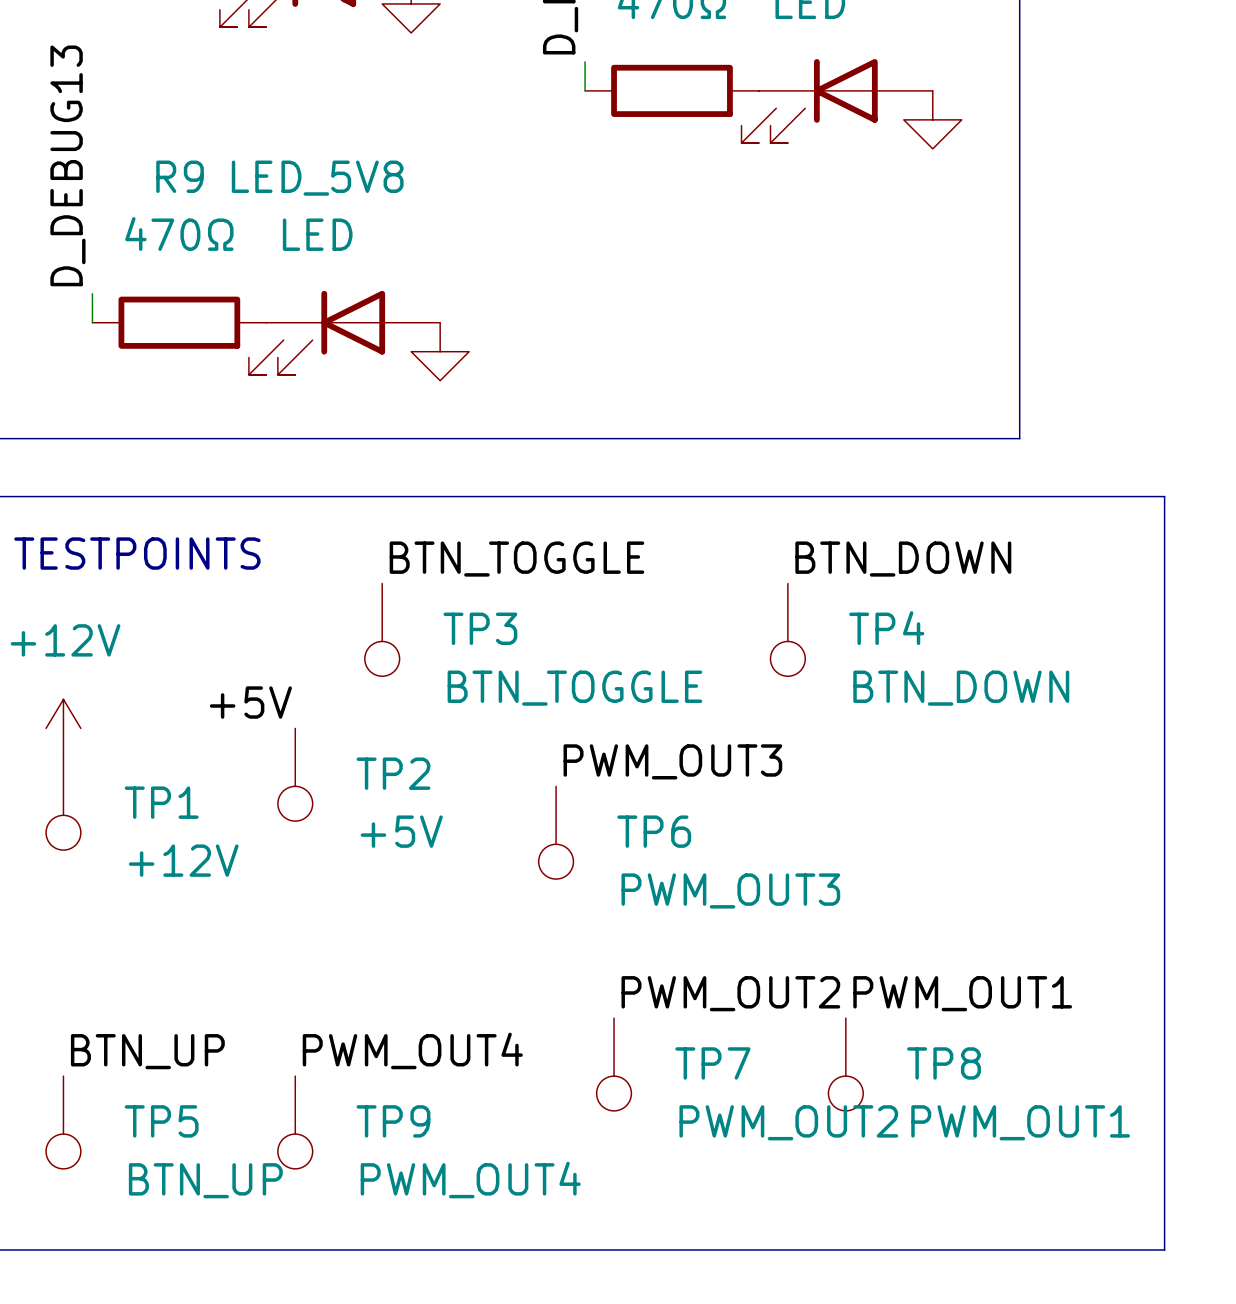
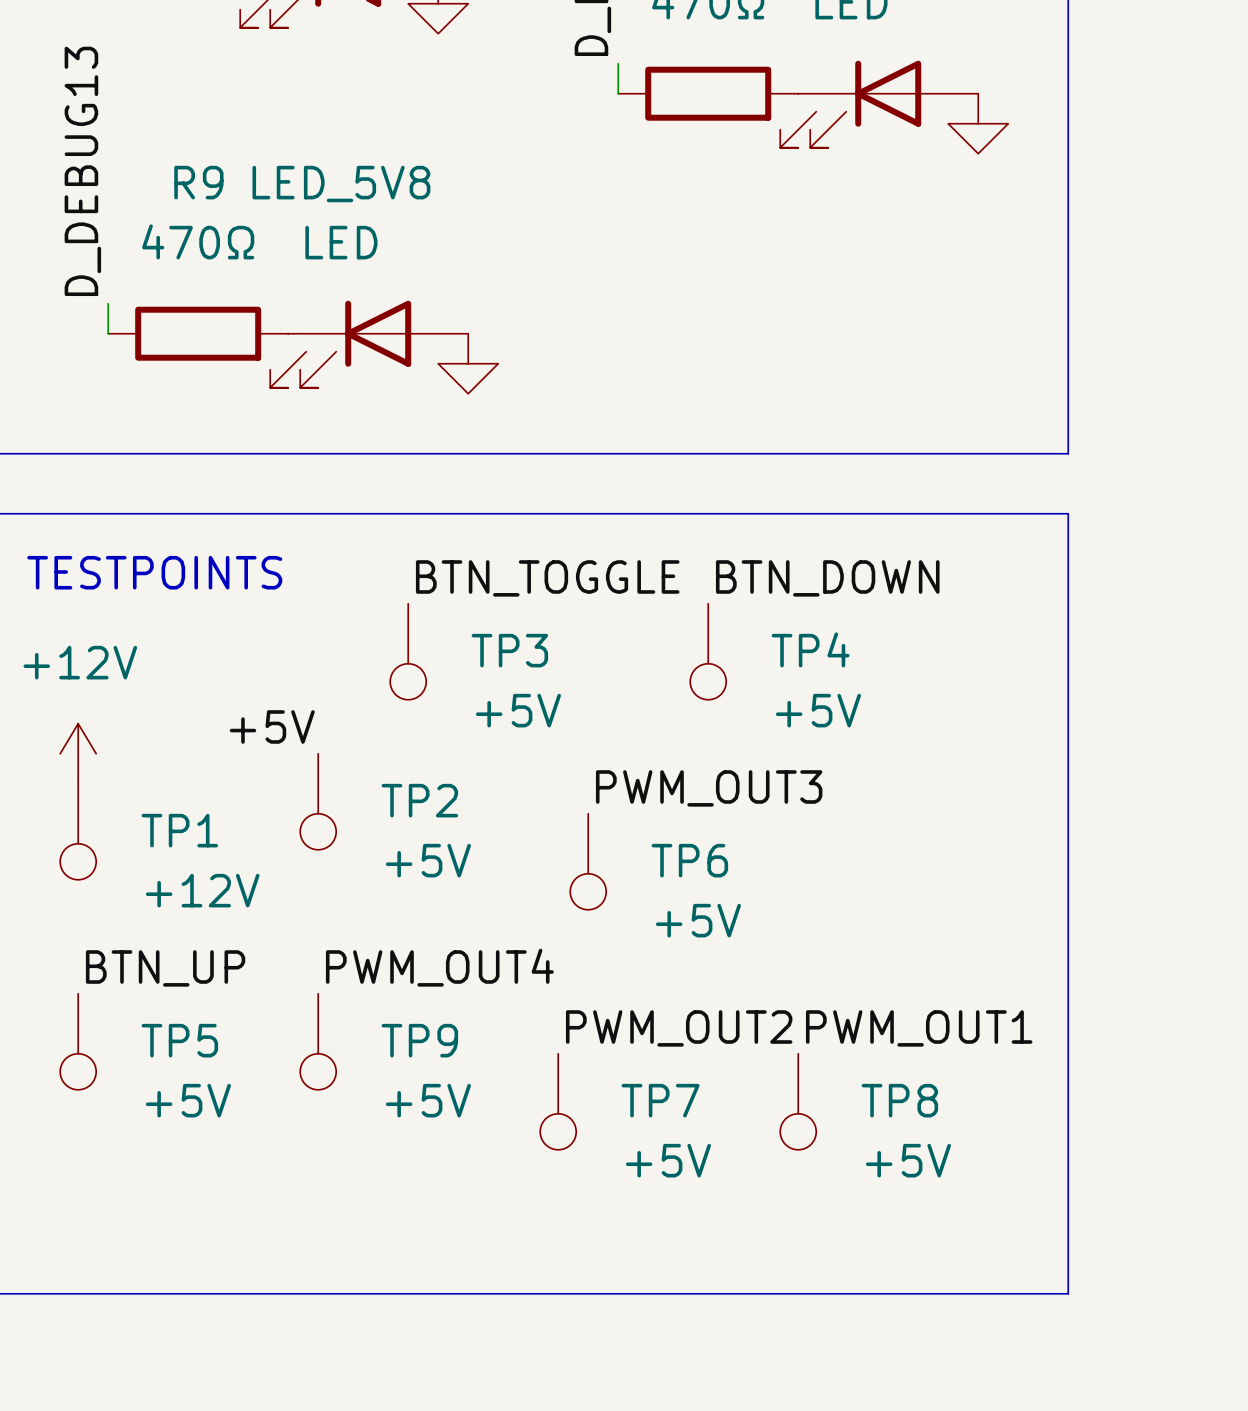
line: (1019, 496) (1164, 496) (1164, 1249) (1019, 1249) -> (1068, 513) (1068, 1293)
label position: BTN_DOWN (903, 559) -> BTN_DOWN (827, 578)
TP4 position: (787, 629) -> (708, 651)
TP3 value: BTN_TOGGLE (574, 688) -> +5V (518, 710)
TP4 value: BTN_DOWN (961, 688) -> +5V (818, 710)
TP6 value: PWM_OUT3 (730, 890) -> +5V (698, 920)
label position: PWM_OUT2 (730, 993) -> PWM_OUT2 (679, 1028)
label position: PWM_OUT1 (962, 993) -> PWM_OUT1 (919, 1028)
label position: PWM_OUT4 (412, 1050) -> PWM_OUT4 (439, 967)
label position: BTN_UP (147, 1051) -> BTN_UP (165, 968)
TP7 position: (614, 1064) -> (558, 1101)
TP8 position: (845, 1064) -> (798, 1101)
TP5 position: (63, 1122) -> (78, 1041)
TP9 position: (295, 1122) -> (318, 1041)
TP7 value: PWM_OUT2 (788, 1122) -> +5V (668, 1160)
TP8 value: PWM_OUT1 (1020, 1122) -> +5V (908, 1160)
TP5 value: BTN_UP (205, 1180) -> +5V (188, 1100)
TP9 value: PWM_OUT4 (470, 1180) -> +5V (428, 1100)

